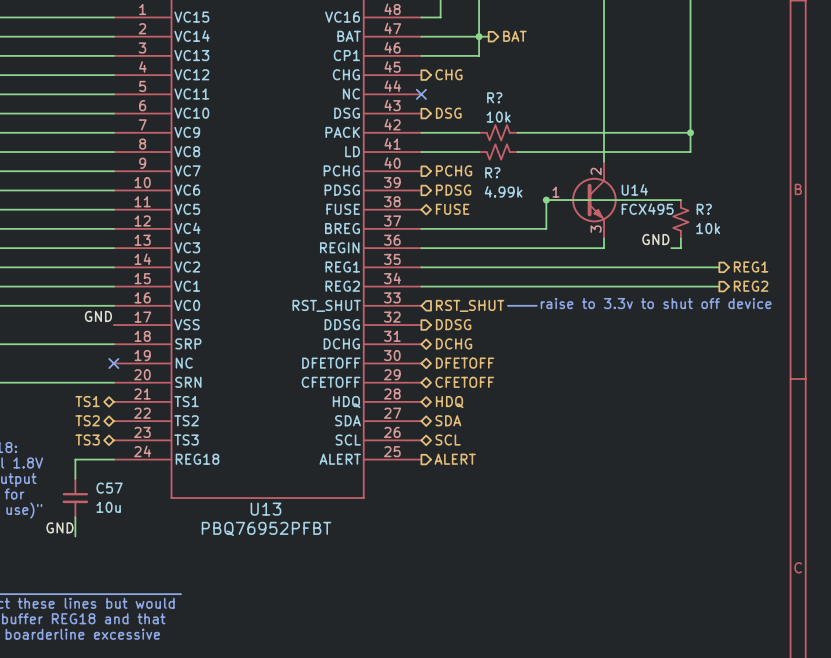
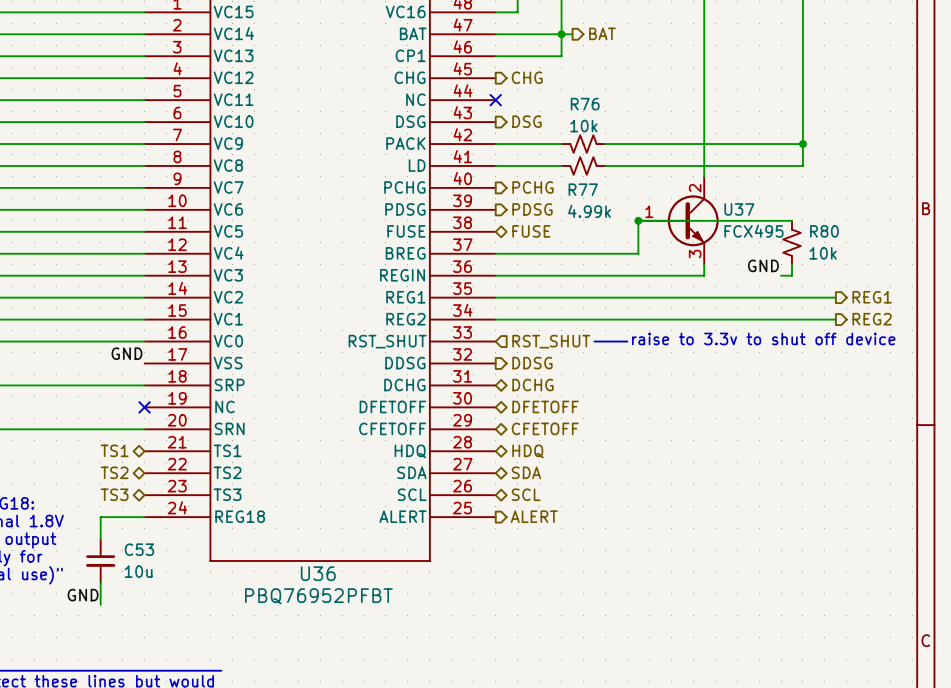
R? name: R? (494, 97) -> R76 (585, 104)
R? name: R? (492, 172) -> R77 (583, 189)
U14 name: U14 (634, 189) -> U37 (739, 209)
R? name: R? (704, 209) -> R80 (824, 231)
C57 name: C57 (109, 488) -> C53 (139, 549)
U13 name: U13 (265, 509) -> U36 (318, 573)

